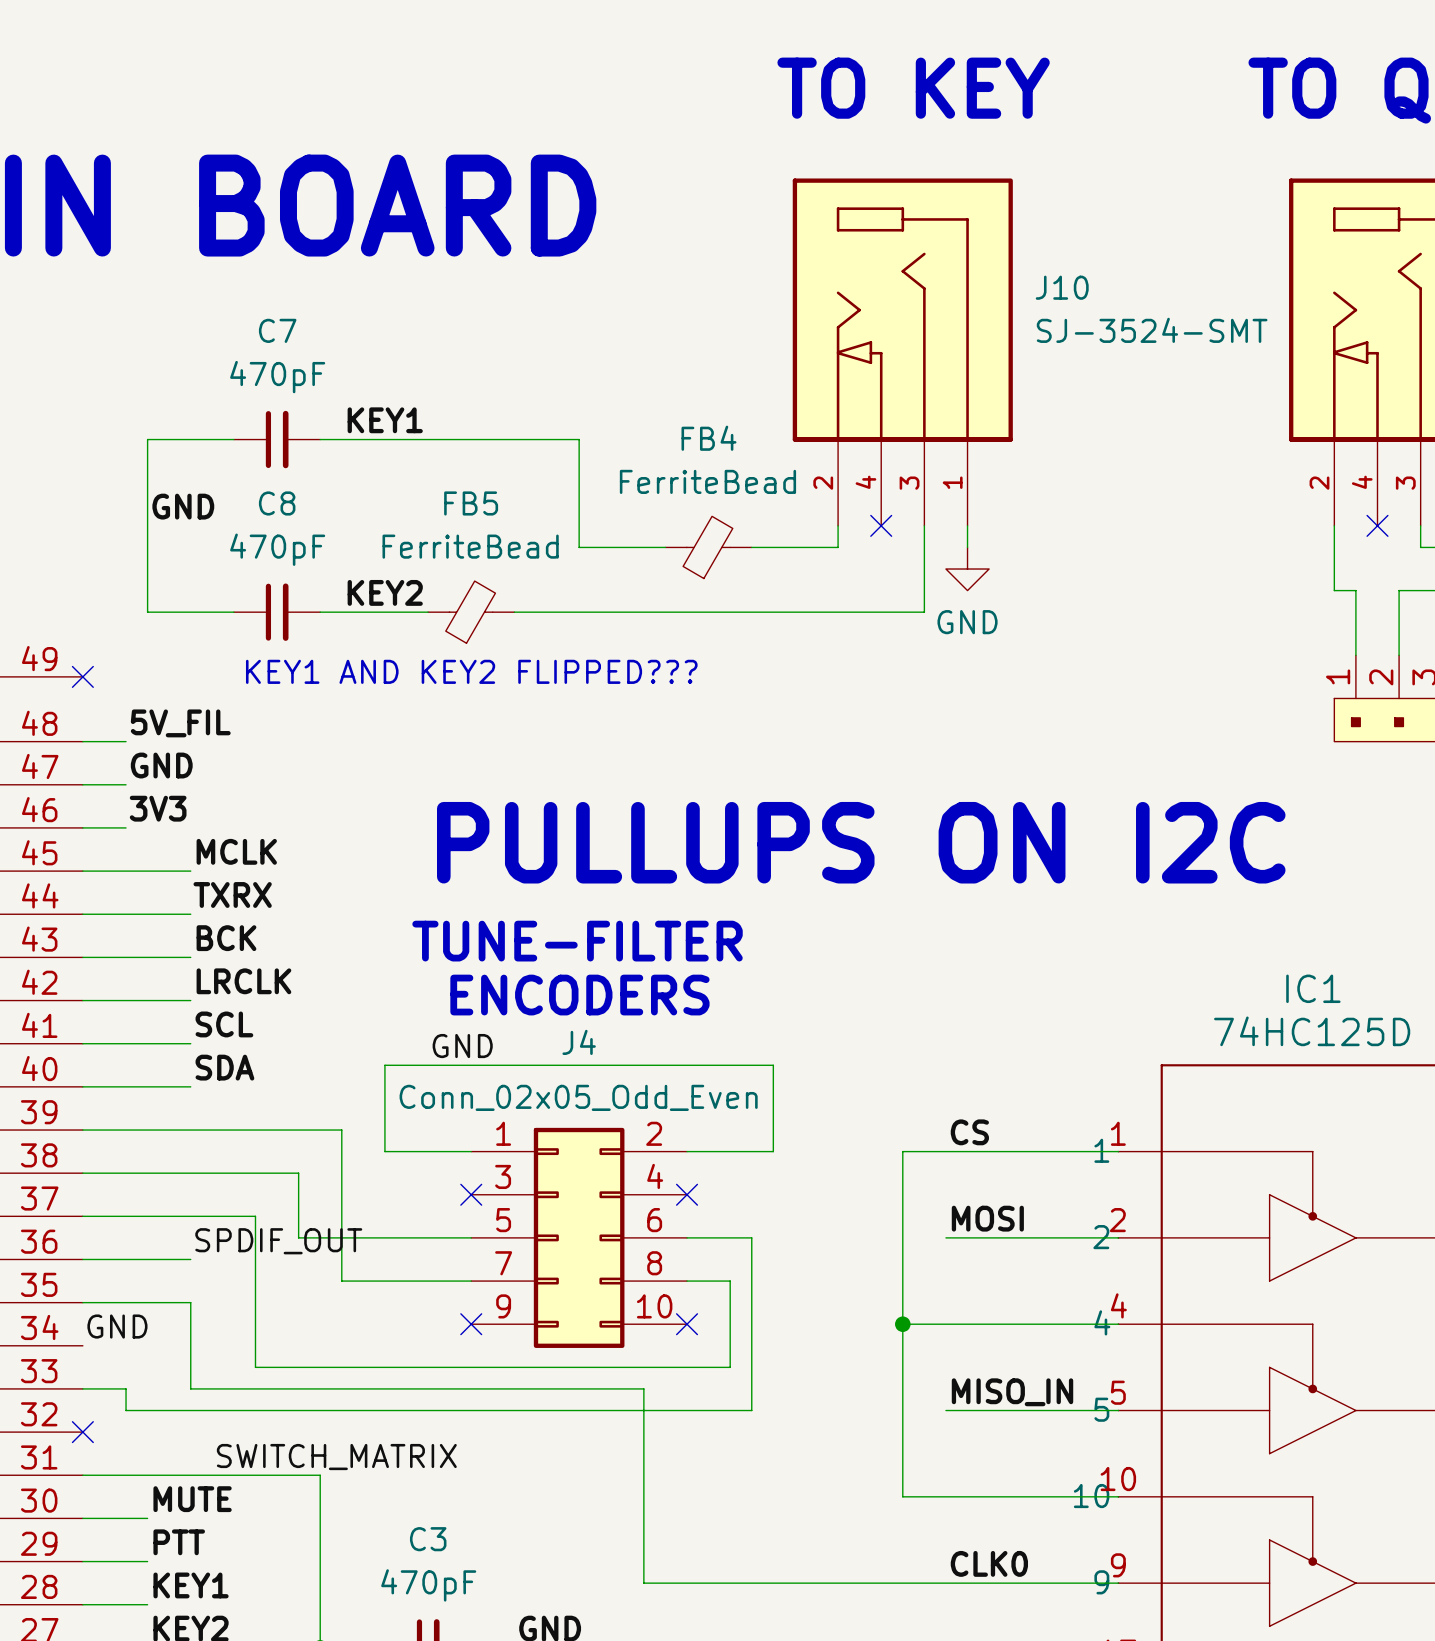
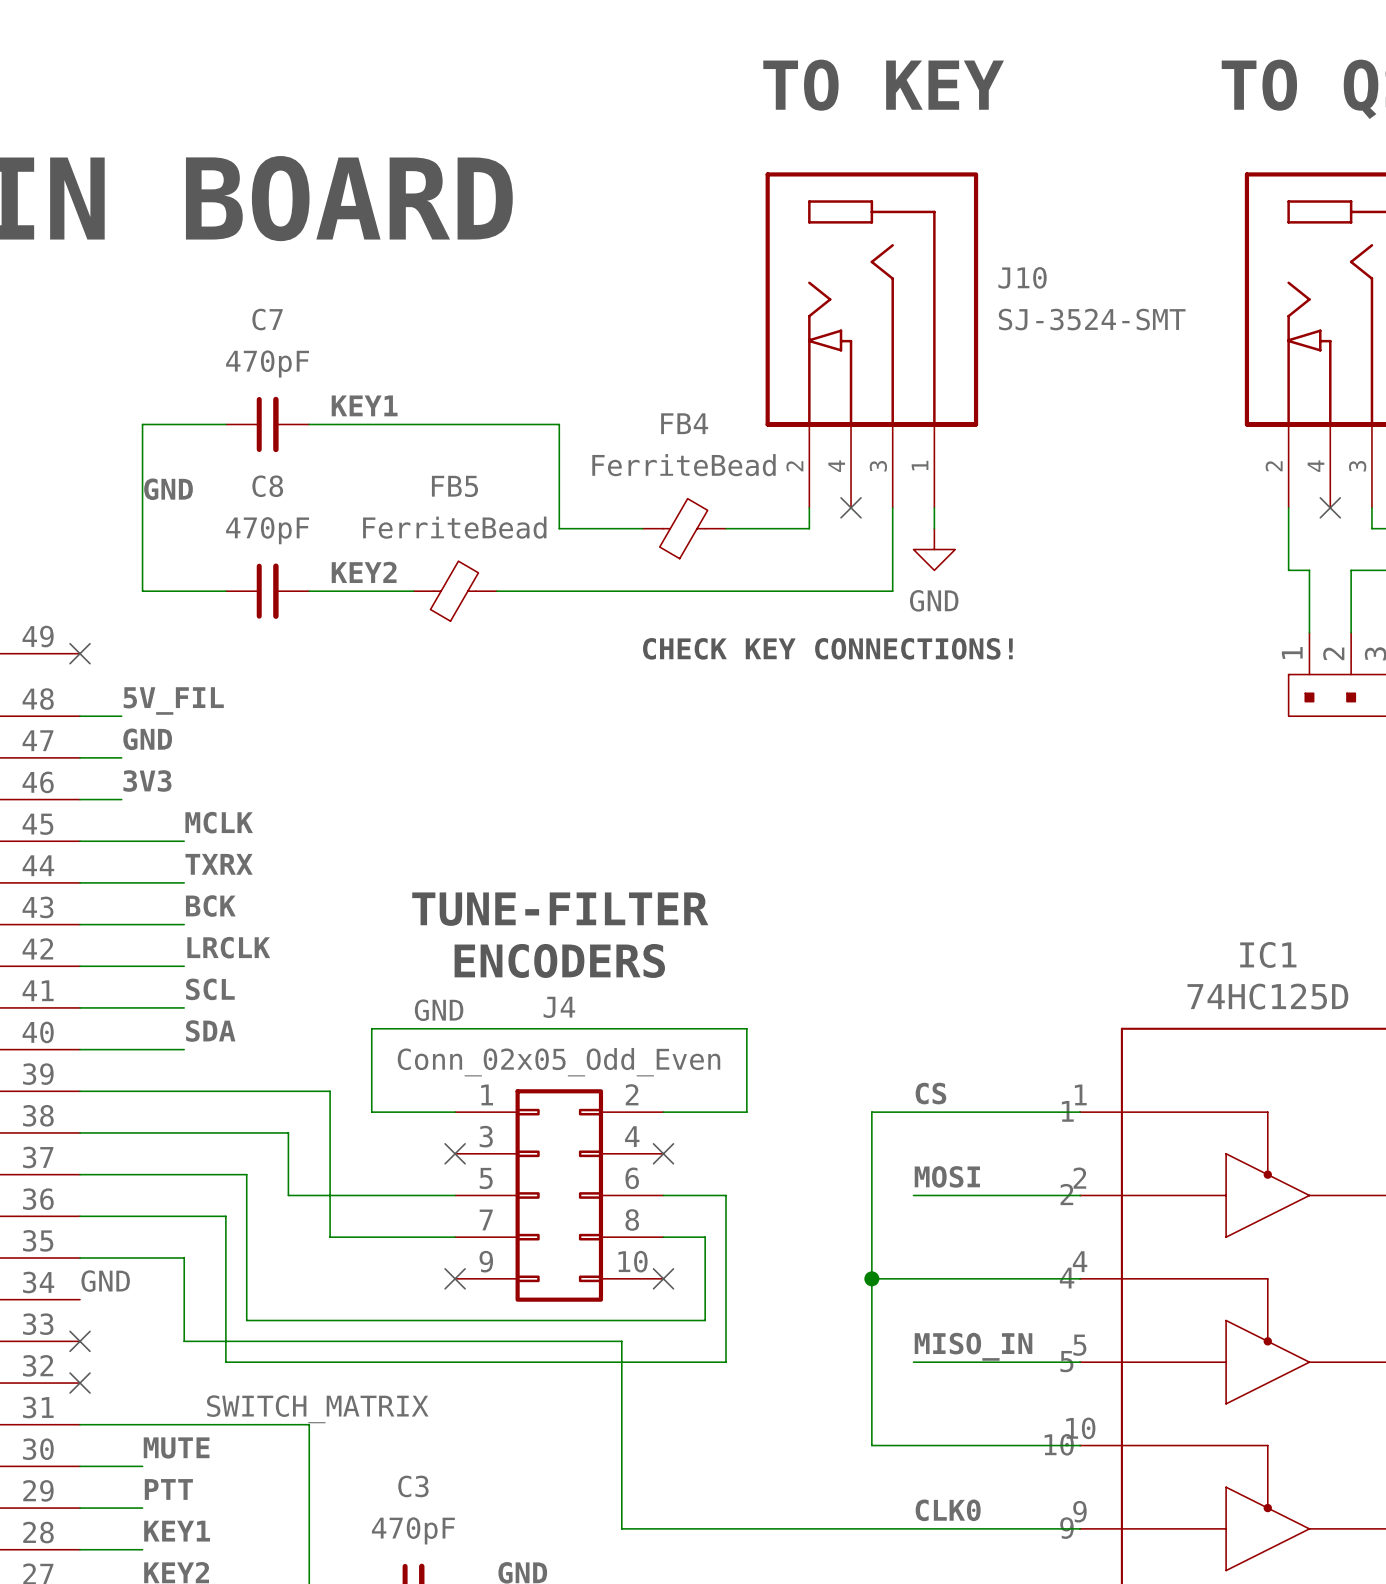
text: KEY1 AND KEY2 FLIPPED??? (471, 671) -> none
text: none -> CHECK KEY CONNECTIONS! (827, 648)
text: PULLUPS ON I2C (861, 842) -> none
label: SPDIF_OUT (278, 1241) -> none
wire: (82, 1388) (126, 1388) (126, 1410) (233, 1410) -> (184, 1216) (225, 1216) (225, 1362)
no-connect mark: none -> (80, 1341)

